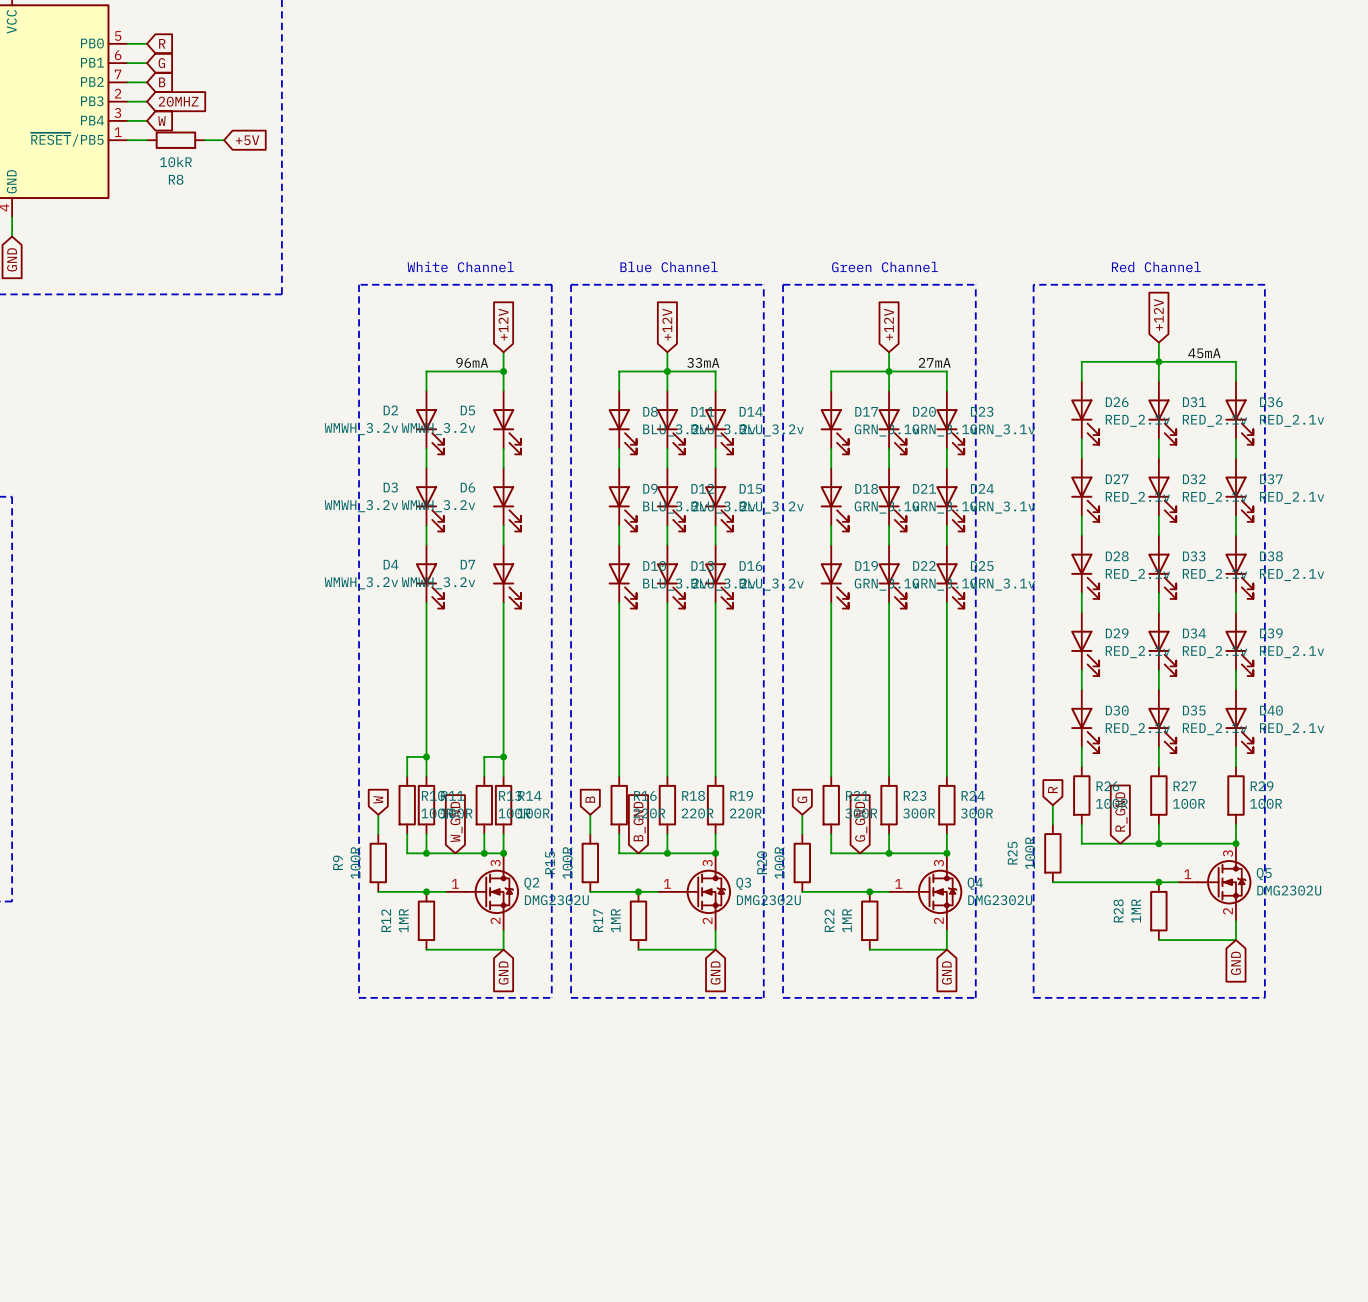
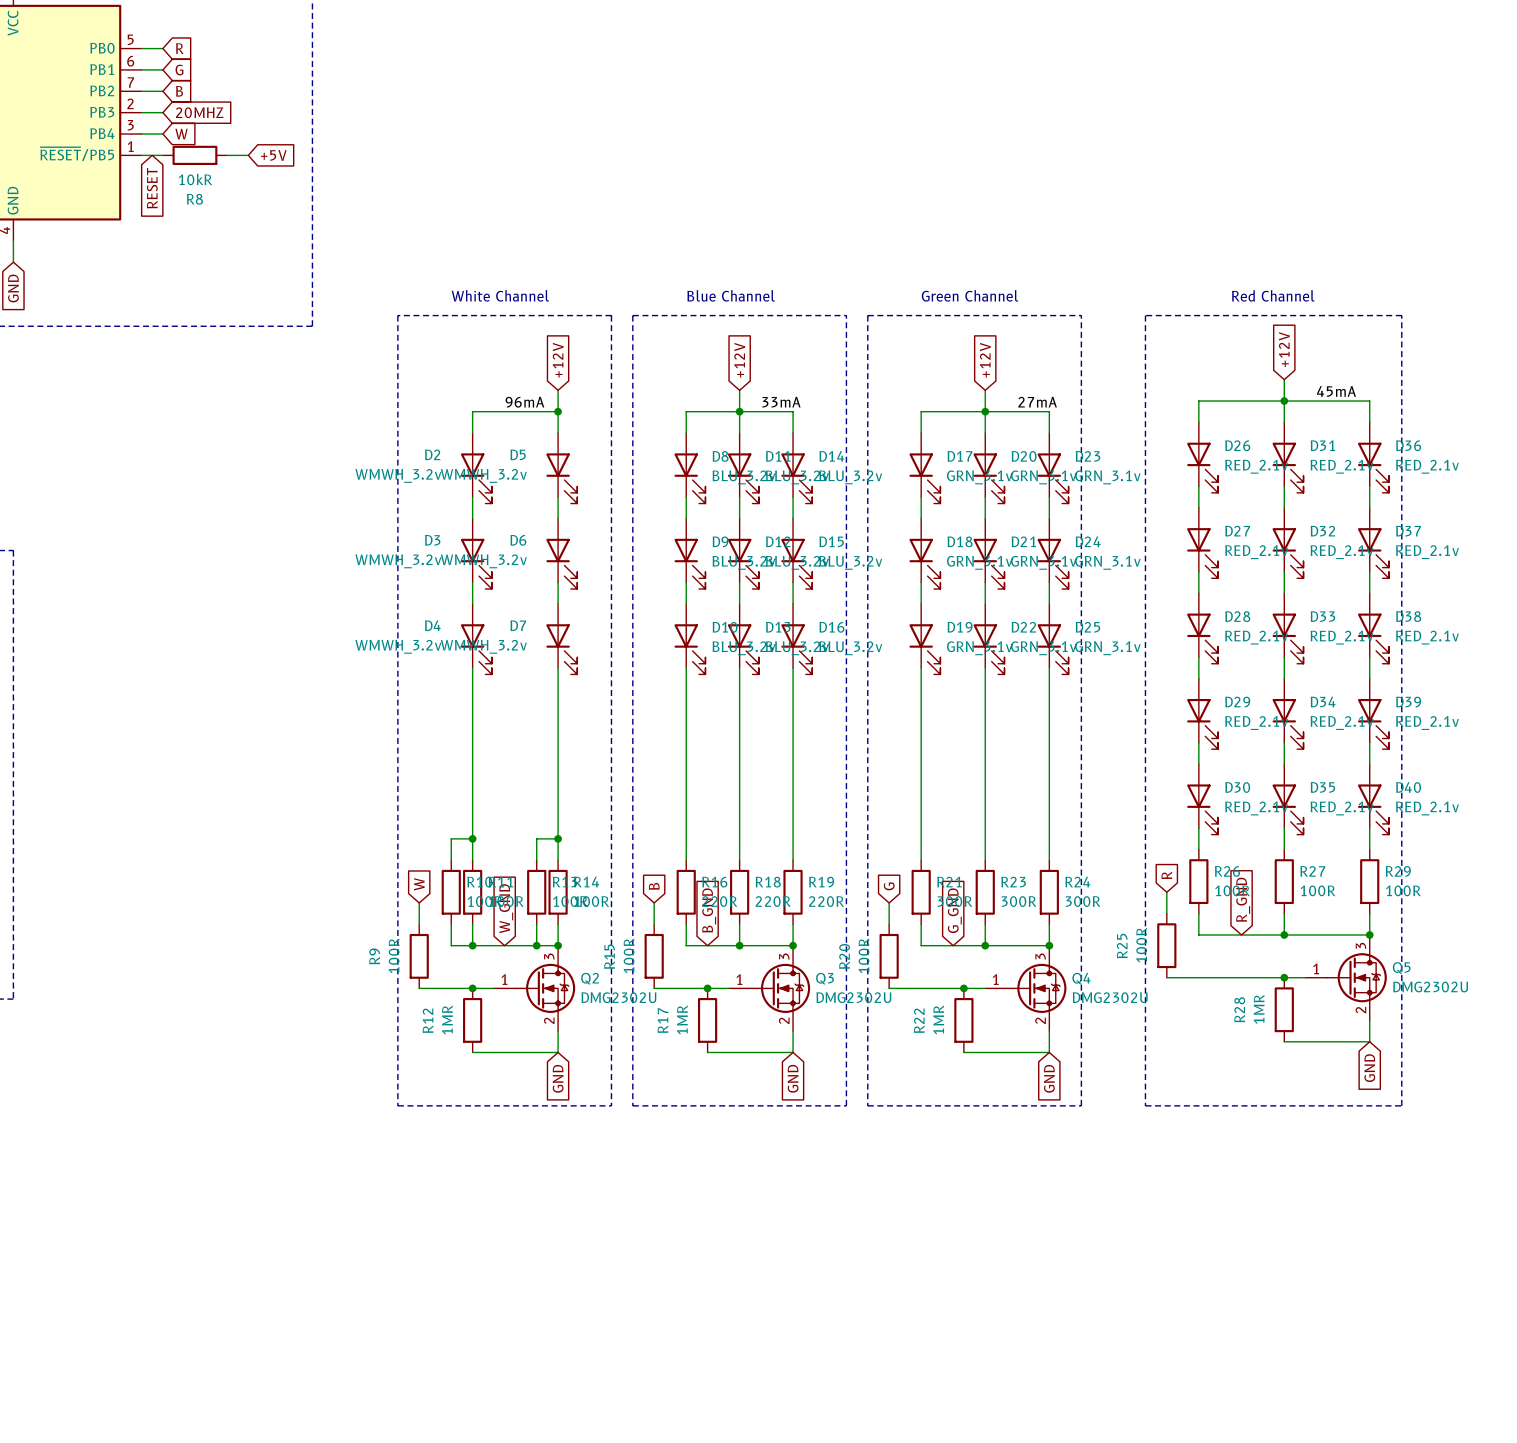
global label: none -> RESET (152, 188)

